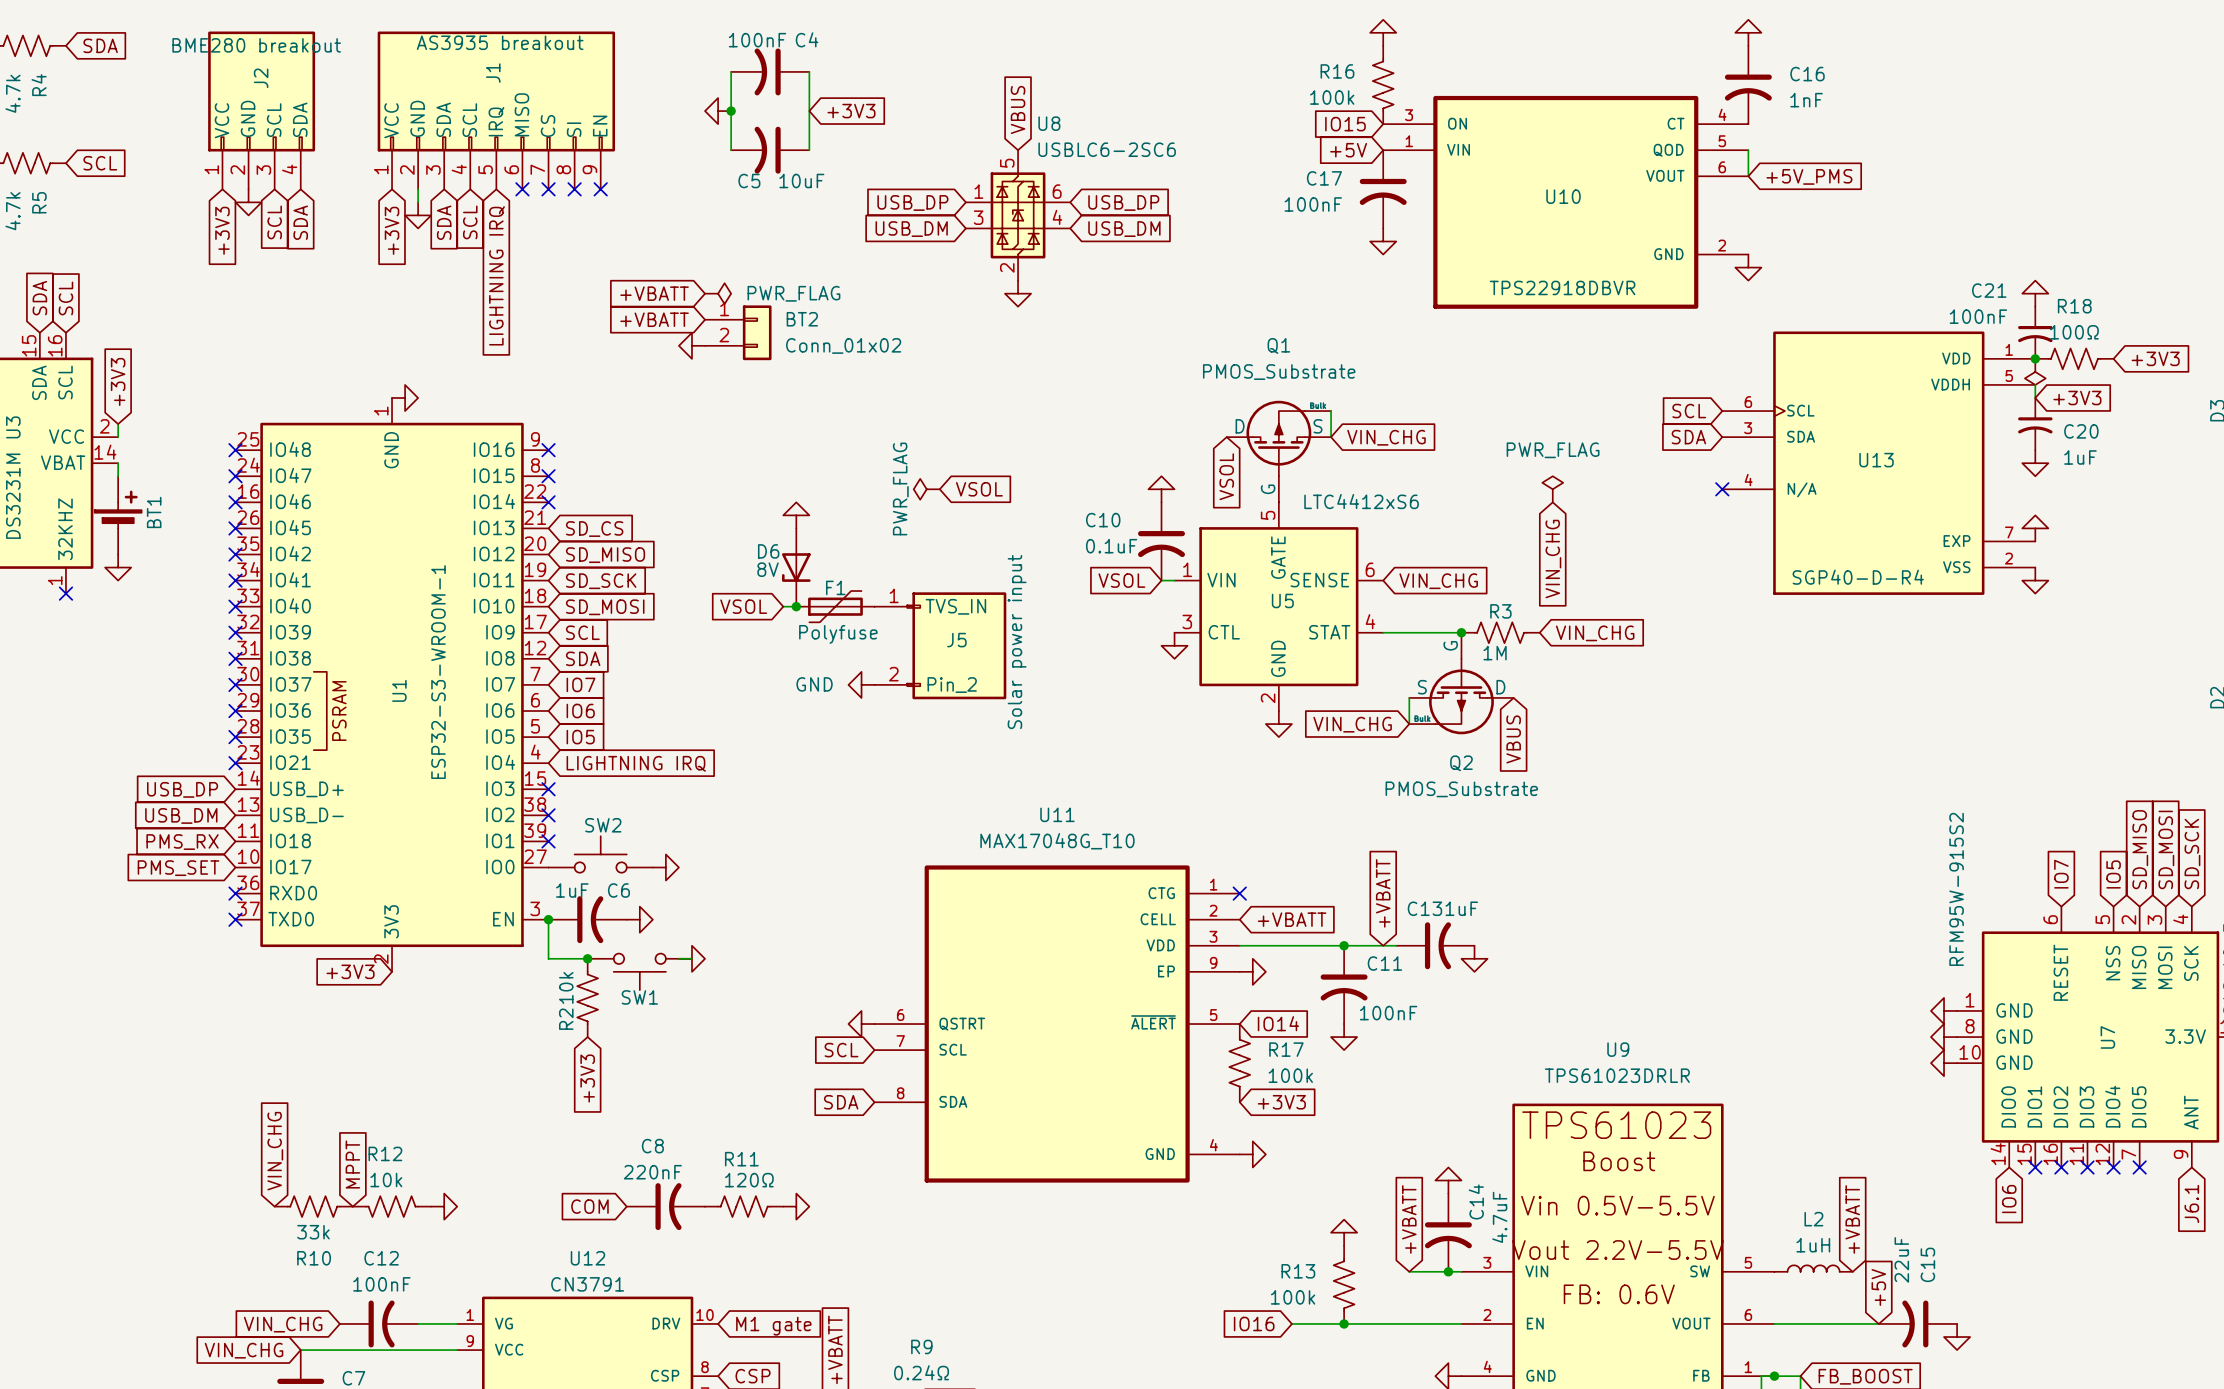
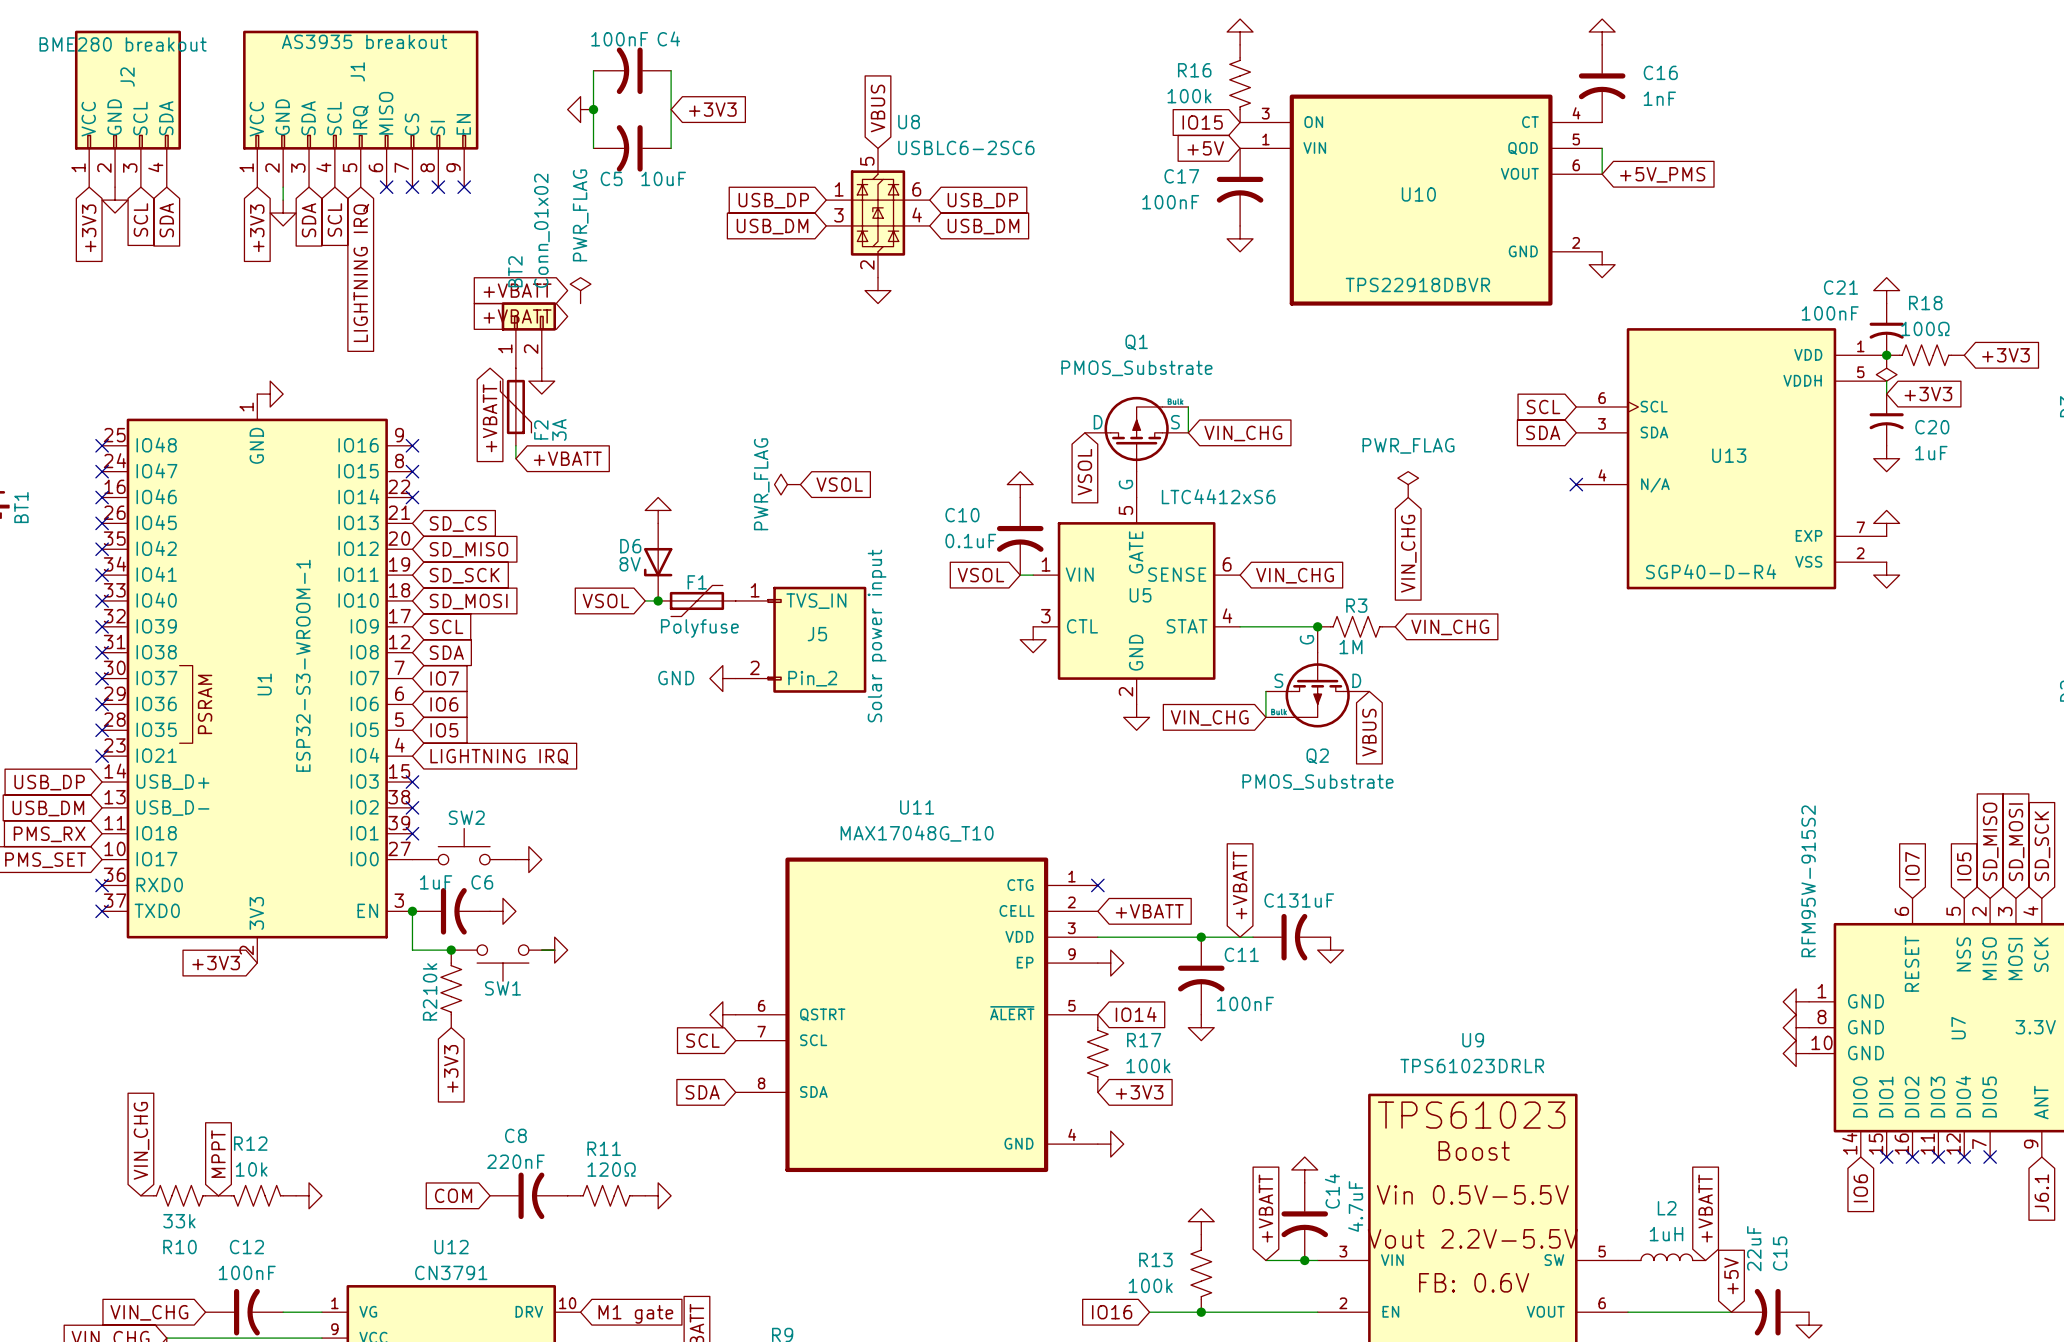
power symbol rotation: 0° (718, 293) -> 90° counterclockwise (580, 290)
BT2 position: (738, 332) -> (528, 335)
BT2 rotation: 0° (757, 332) -> 90° counterclockwise (528, 316)
power symbol rotation: 0° (691, 345) -> 90° counterclockwise (541, 381)
power symbol position: (691, 345) -> (541, 381)
F2: none -> 3A (515, 406)
global label: none -> +VBATT (490, 418)
wire: none -> (515, 445) (515, 458)
global label: none -> +VBATT (567, 458)

